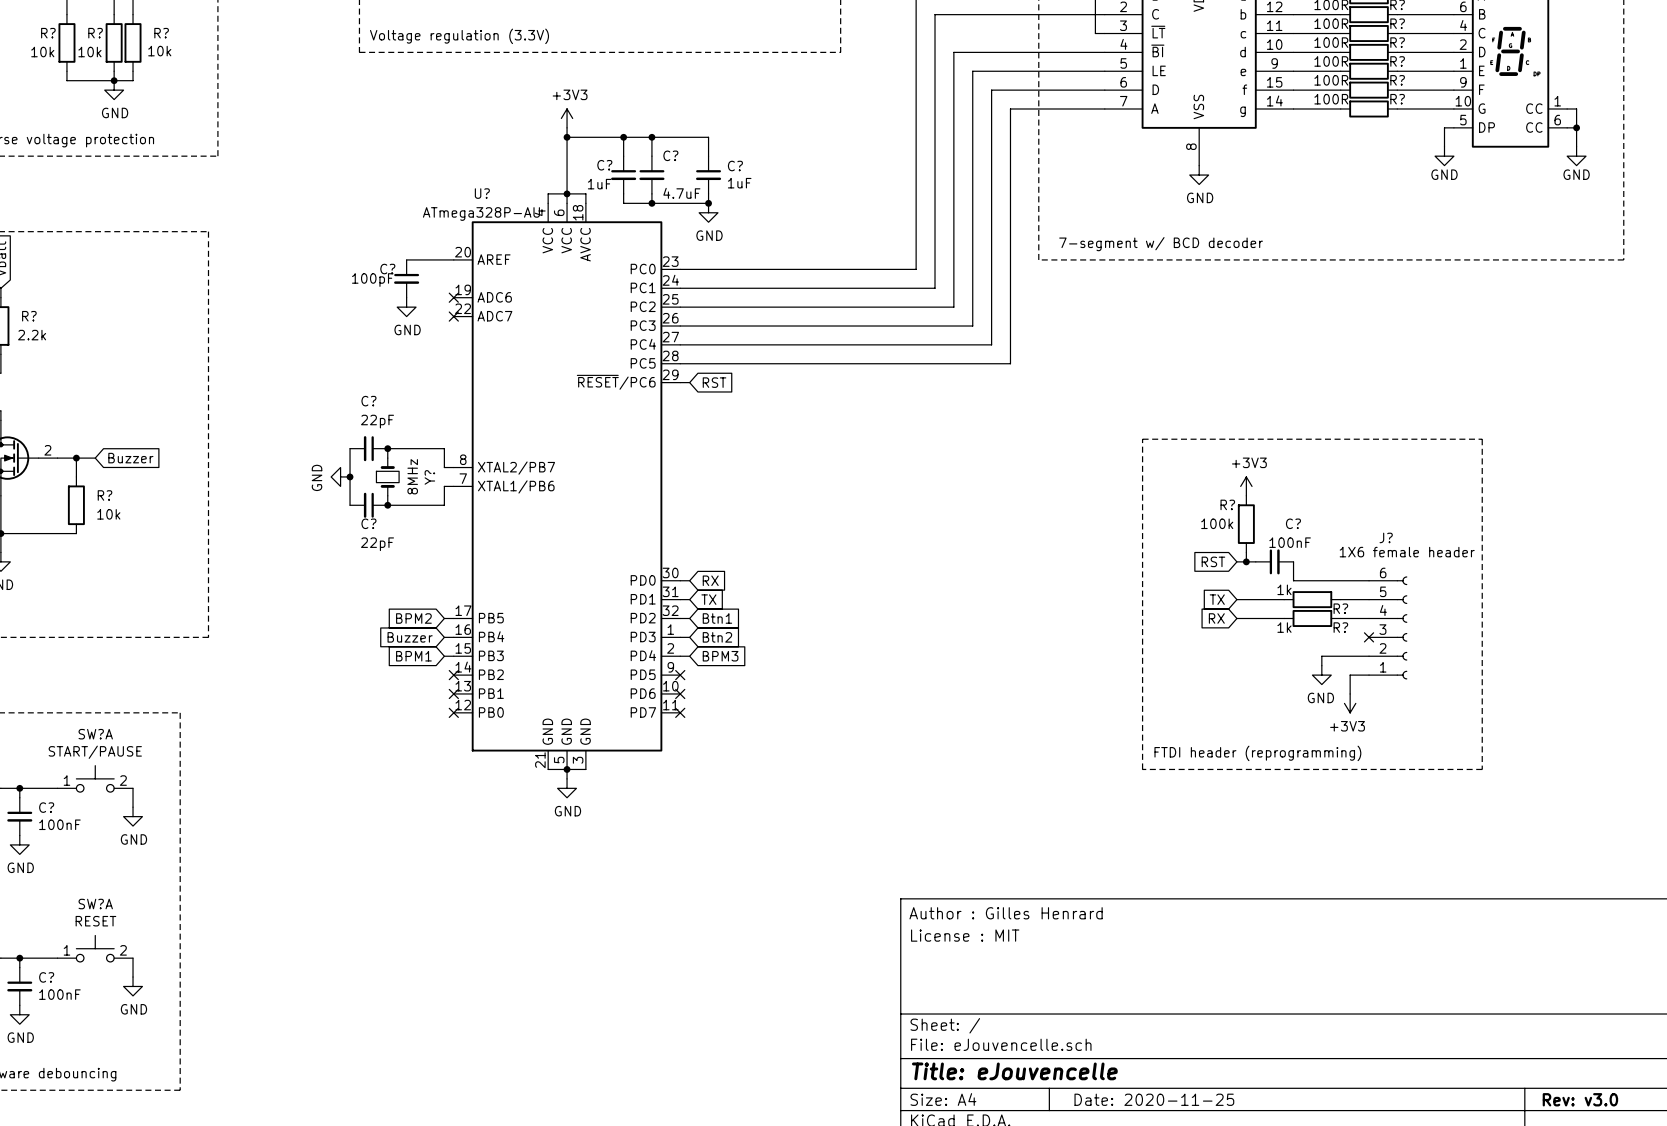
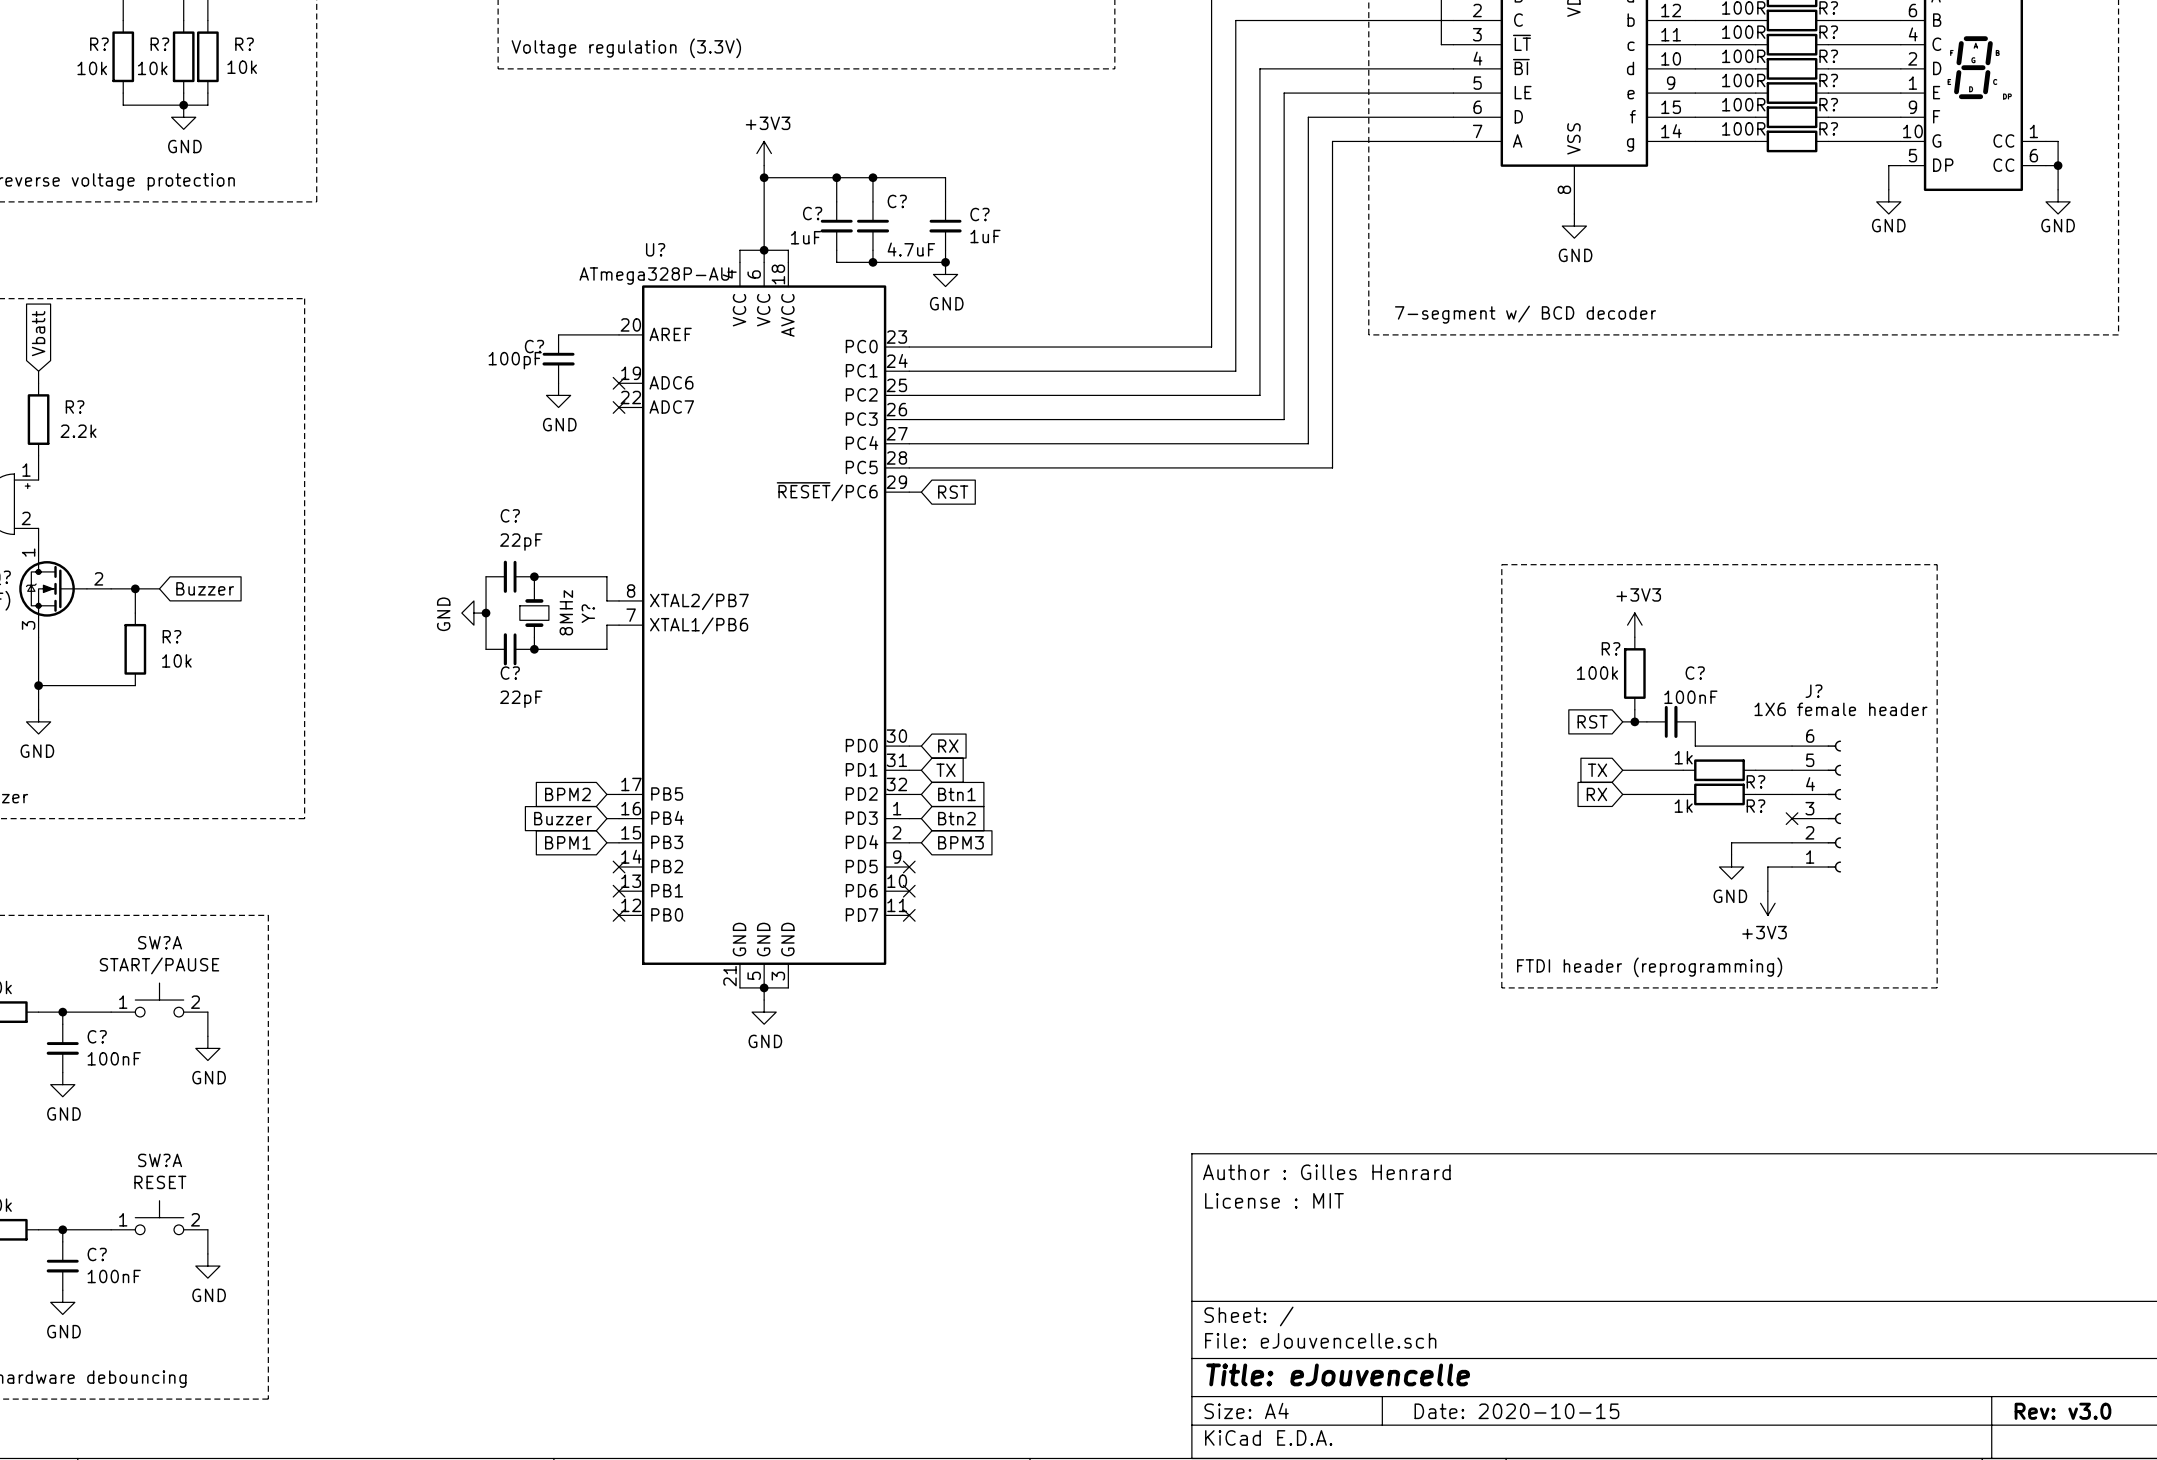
title block: Date: 2020-11-25 (1154, 1099) -> Date: 2020-10-15 (1516, 1411)

